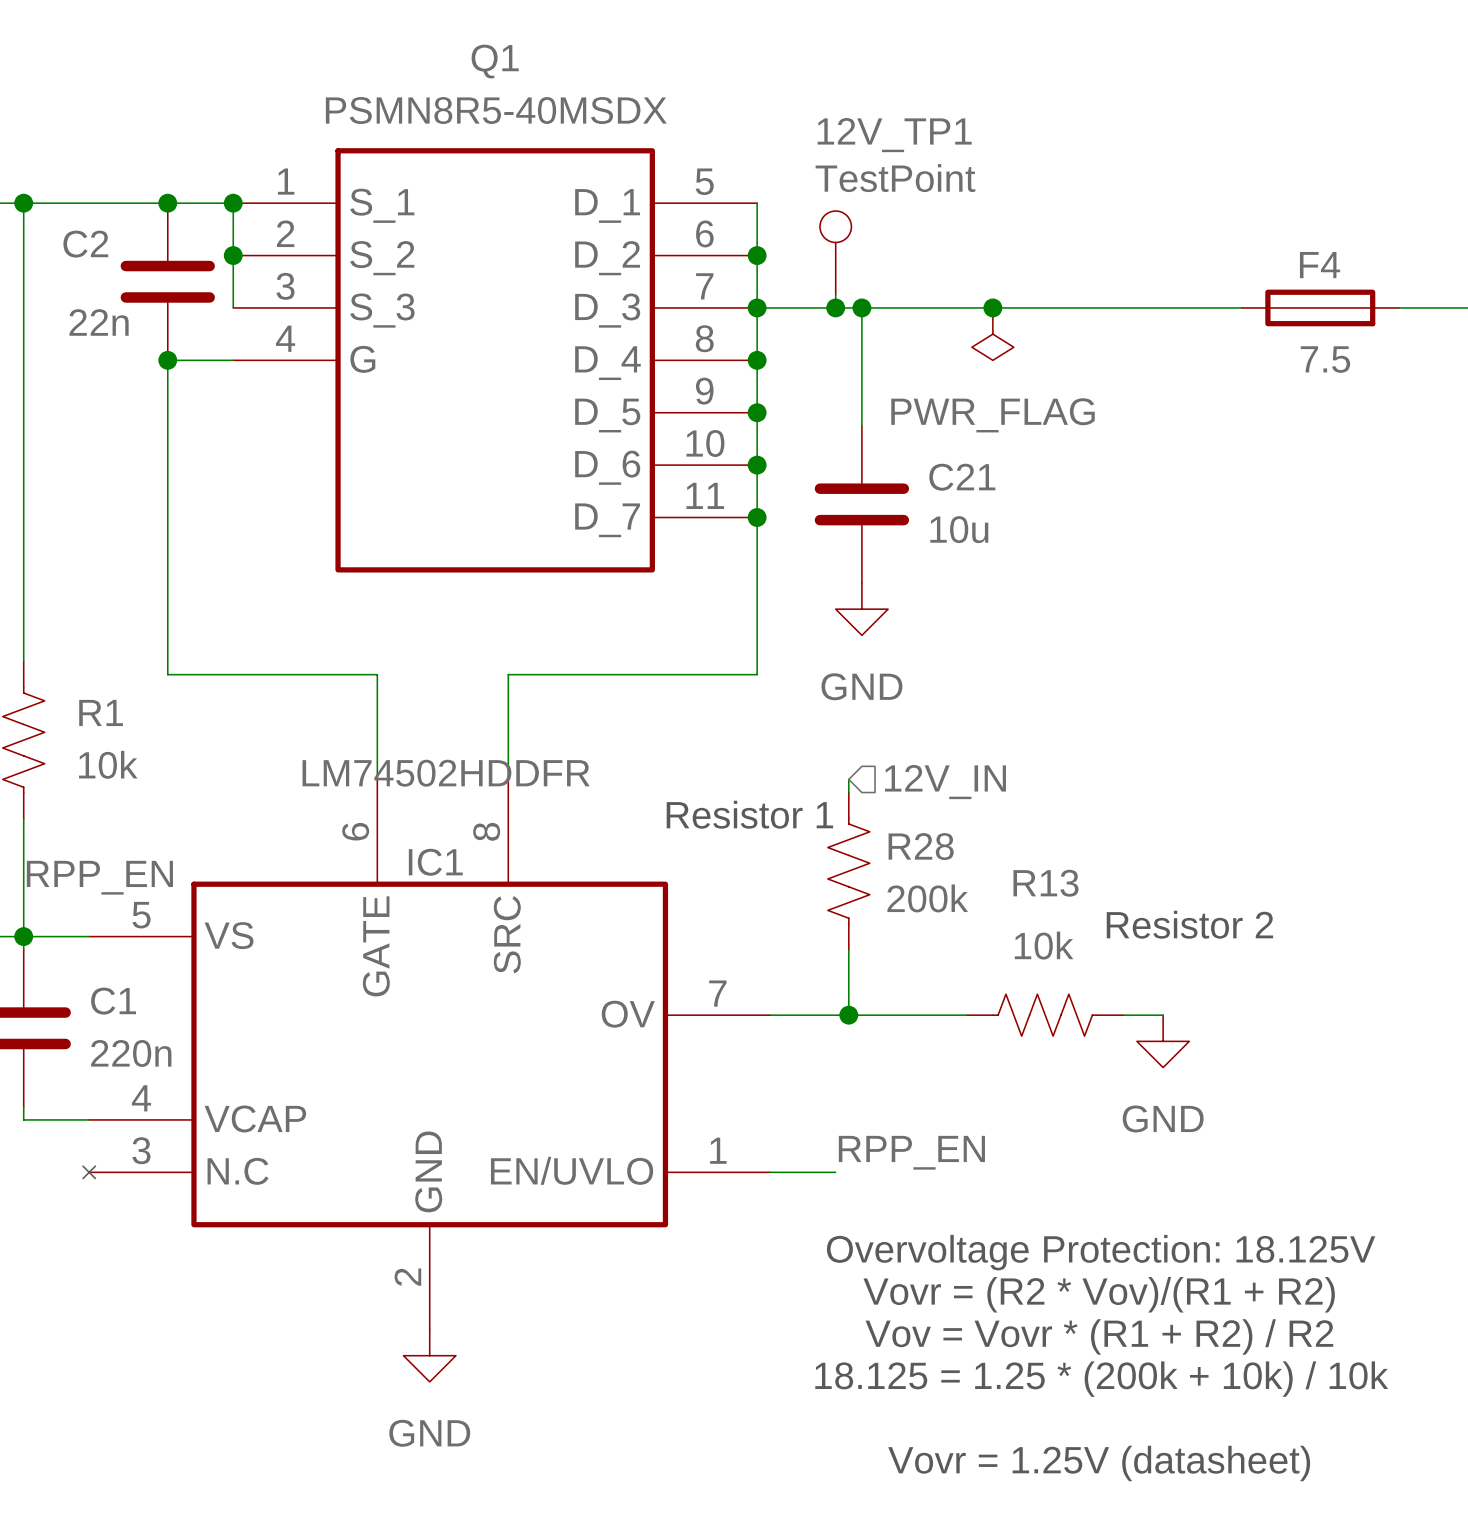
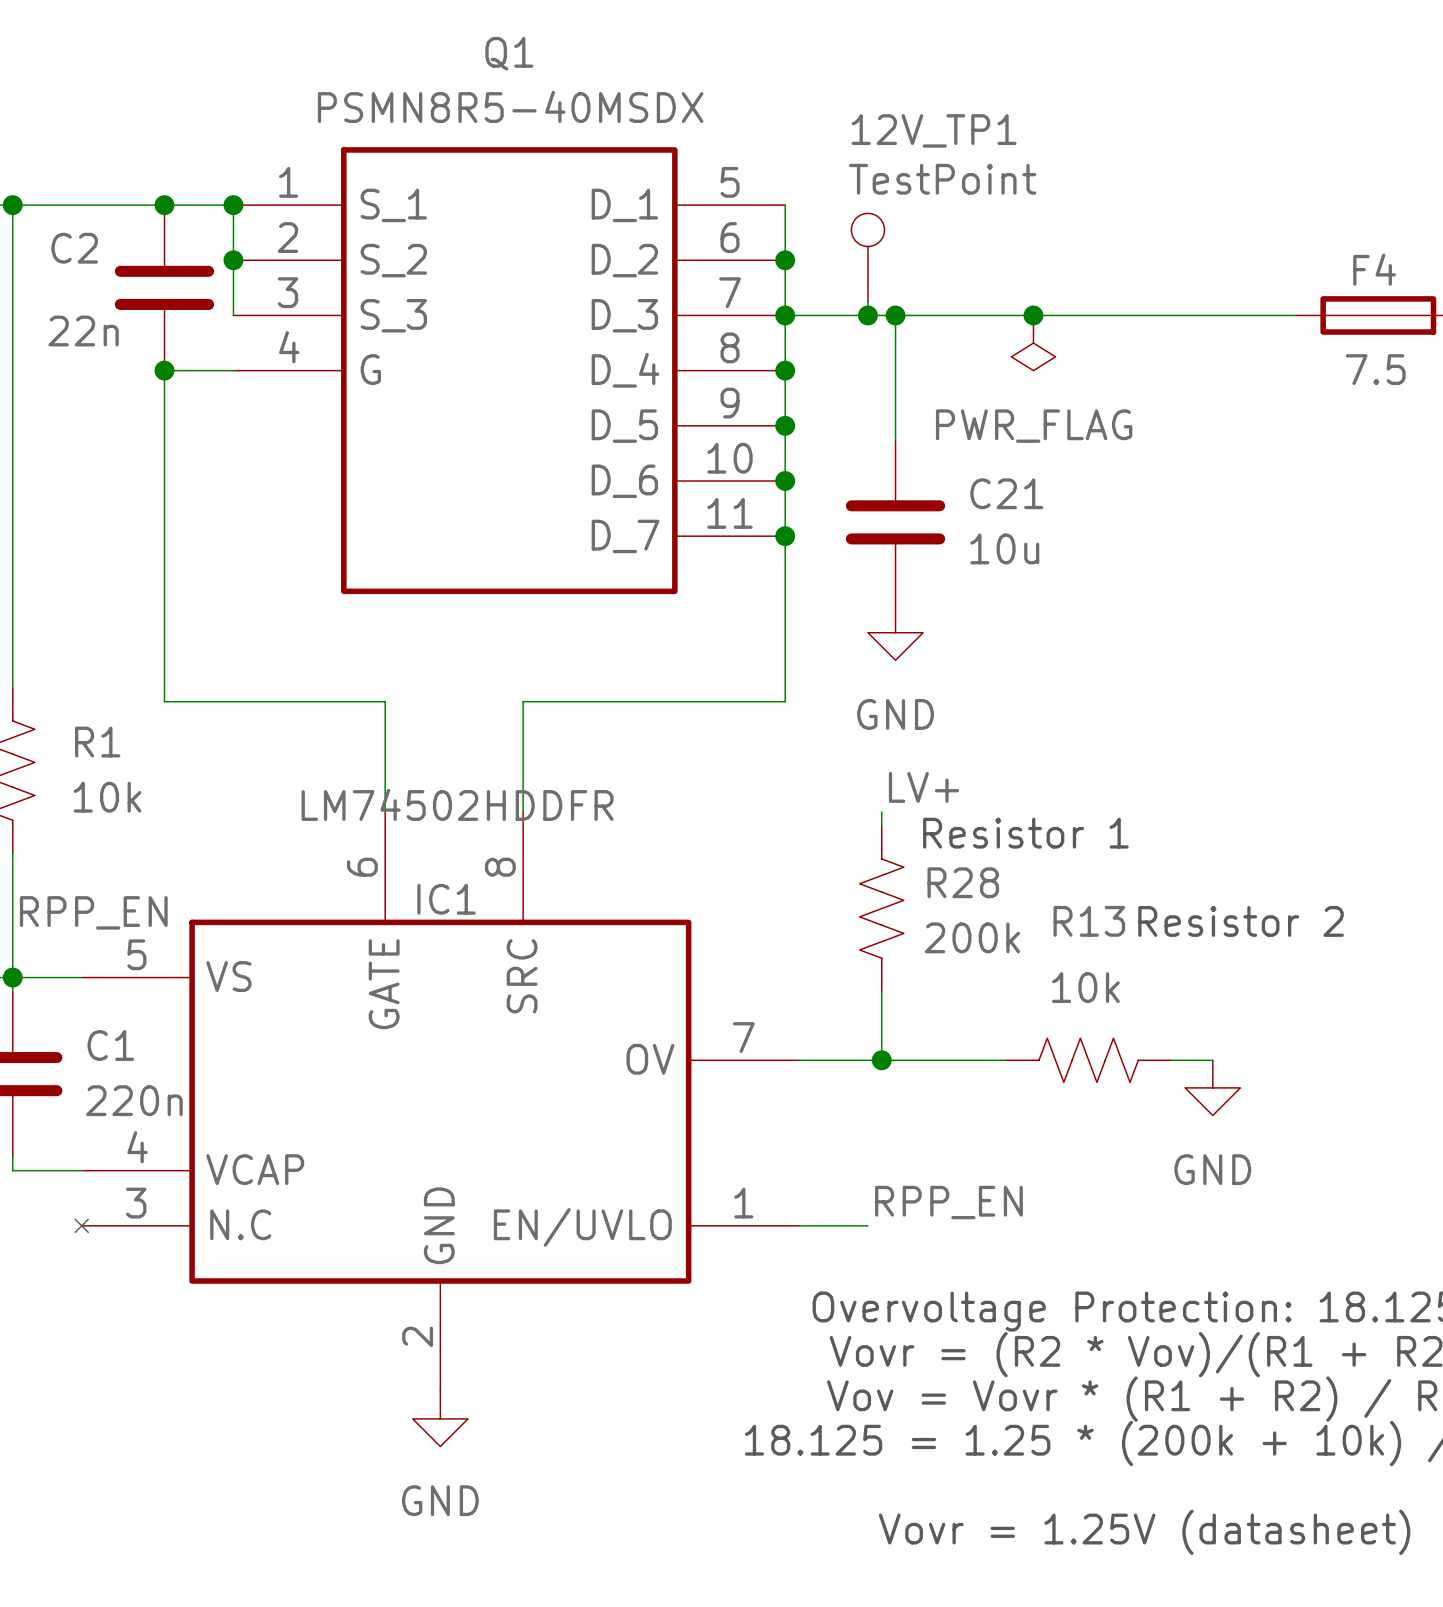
label: none -> LV+ (923, 787)
hierarchical label: 12V_IN (945, 782) -> none
text position: Resistor 1 (749, 814) -> Resistor 1 (1025, 833)
text position: Resistor 2 (1189, 924) -> Resistor 2 (1241, 921)

